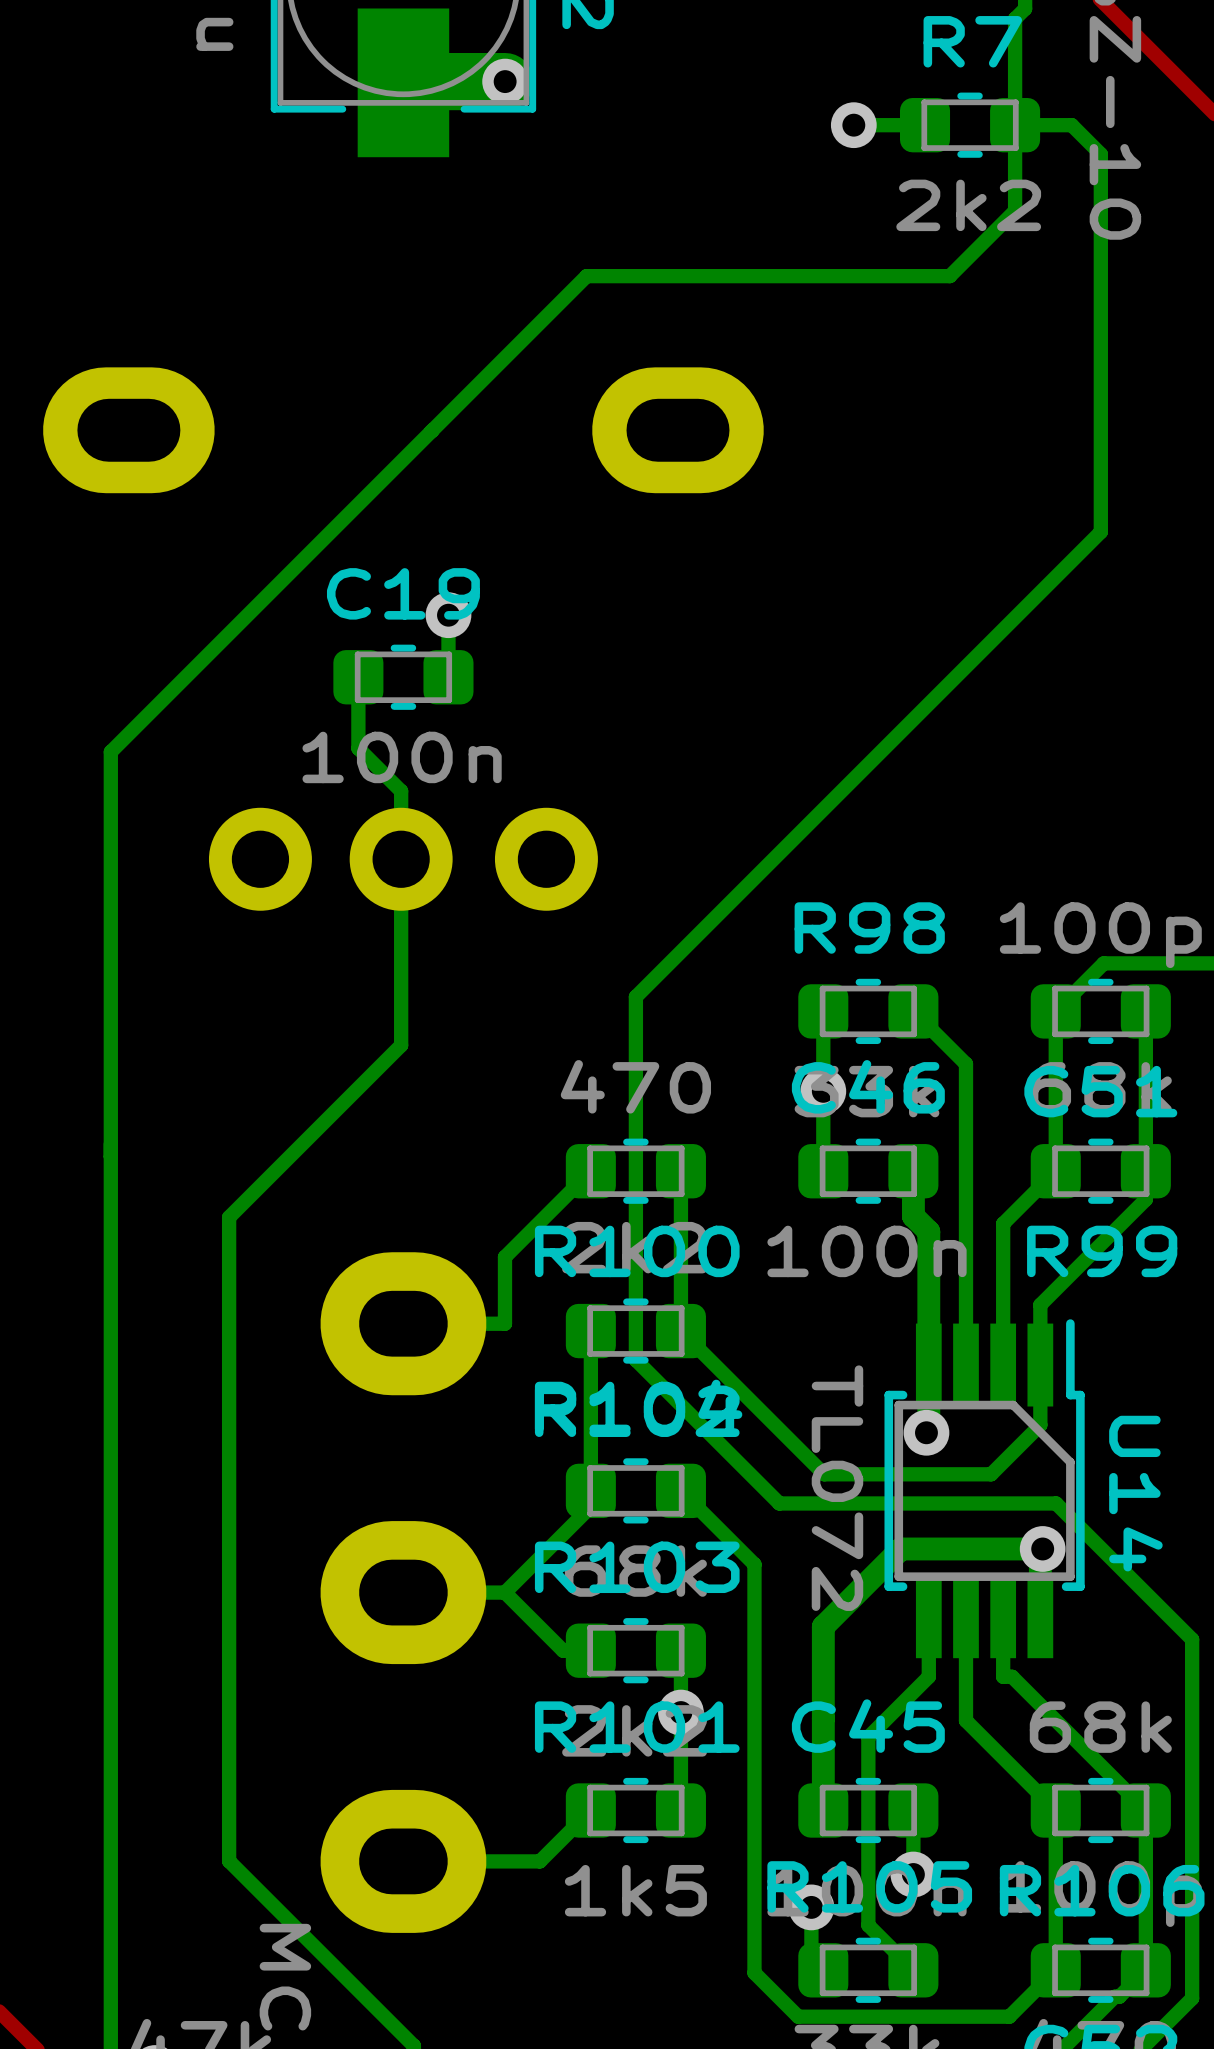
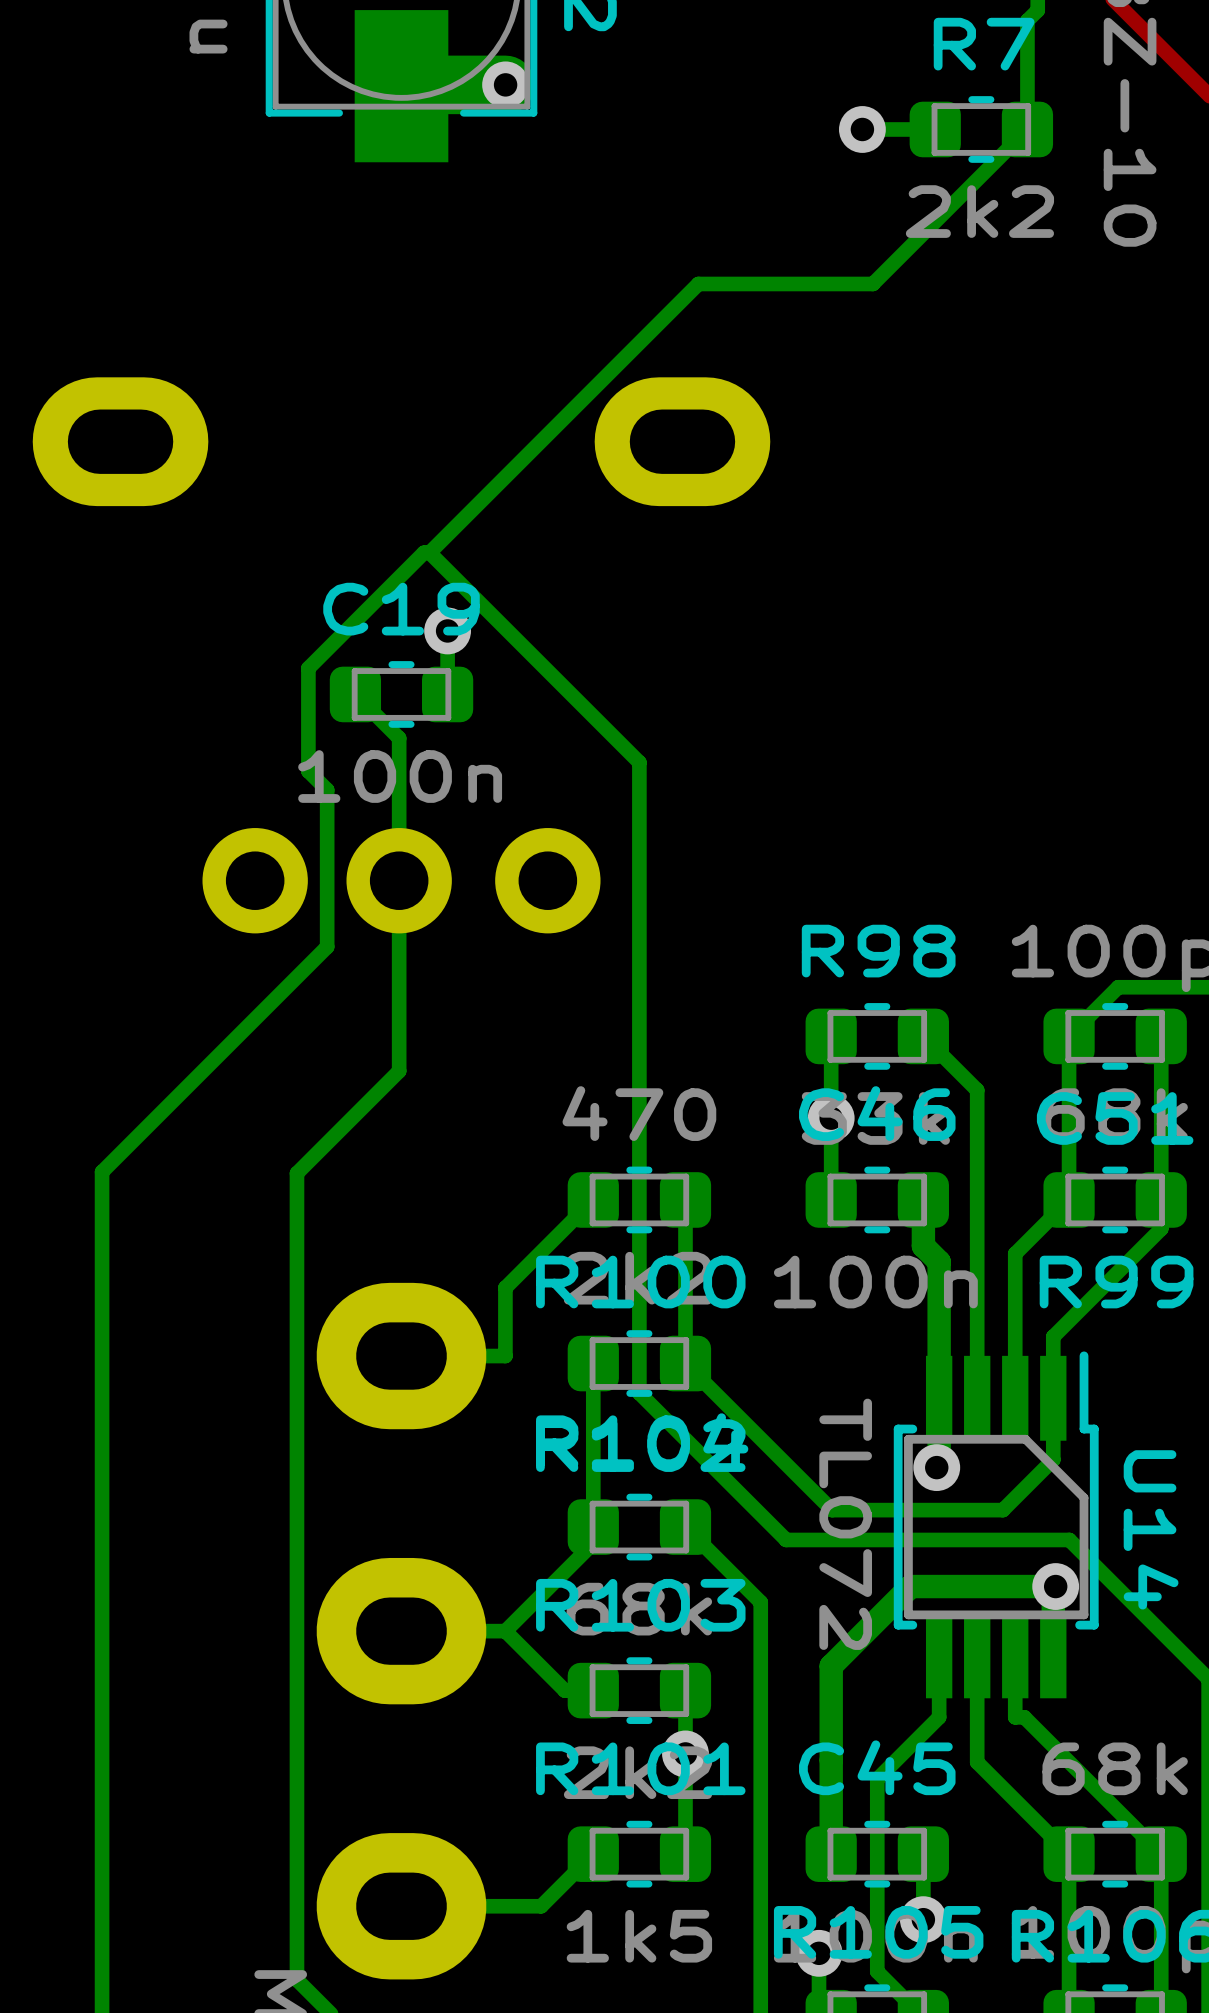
bottom track: none -> (1027, 129) (872, 283)
bottom track: (693, 276) (586, 276) (110, 751) (110, 1143) -> (429, 552) (424, 552) (308, 668) (308, 771) (327, 789) (327, 946) (102, 1172)
bottom track: none -> (698, 283) (429, 552)
bottom track: (864, 276) (949, 276) (1015, 210) (1015, 125) (1071, 125) (1100, 154) (1100, 531) (635, 996) -> (429, 552) (639, 762) (639, 1021)
bottom track: (358, 677) (358, 748) (401, 791) -> (355, 694) (399, 738) (399, 811)
bottom track: (301, 1145) (229, 1217) (229, 1861) (301, 1933) -> (296, 1173) (296, 1979)

